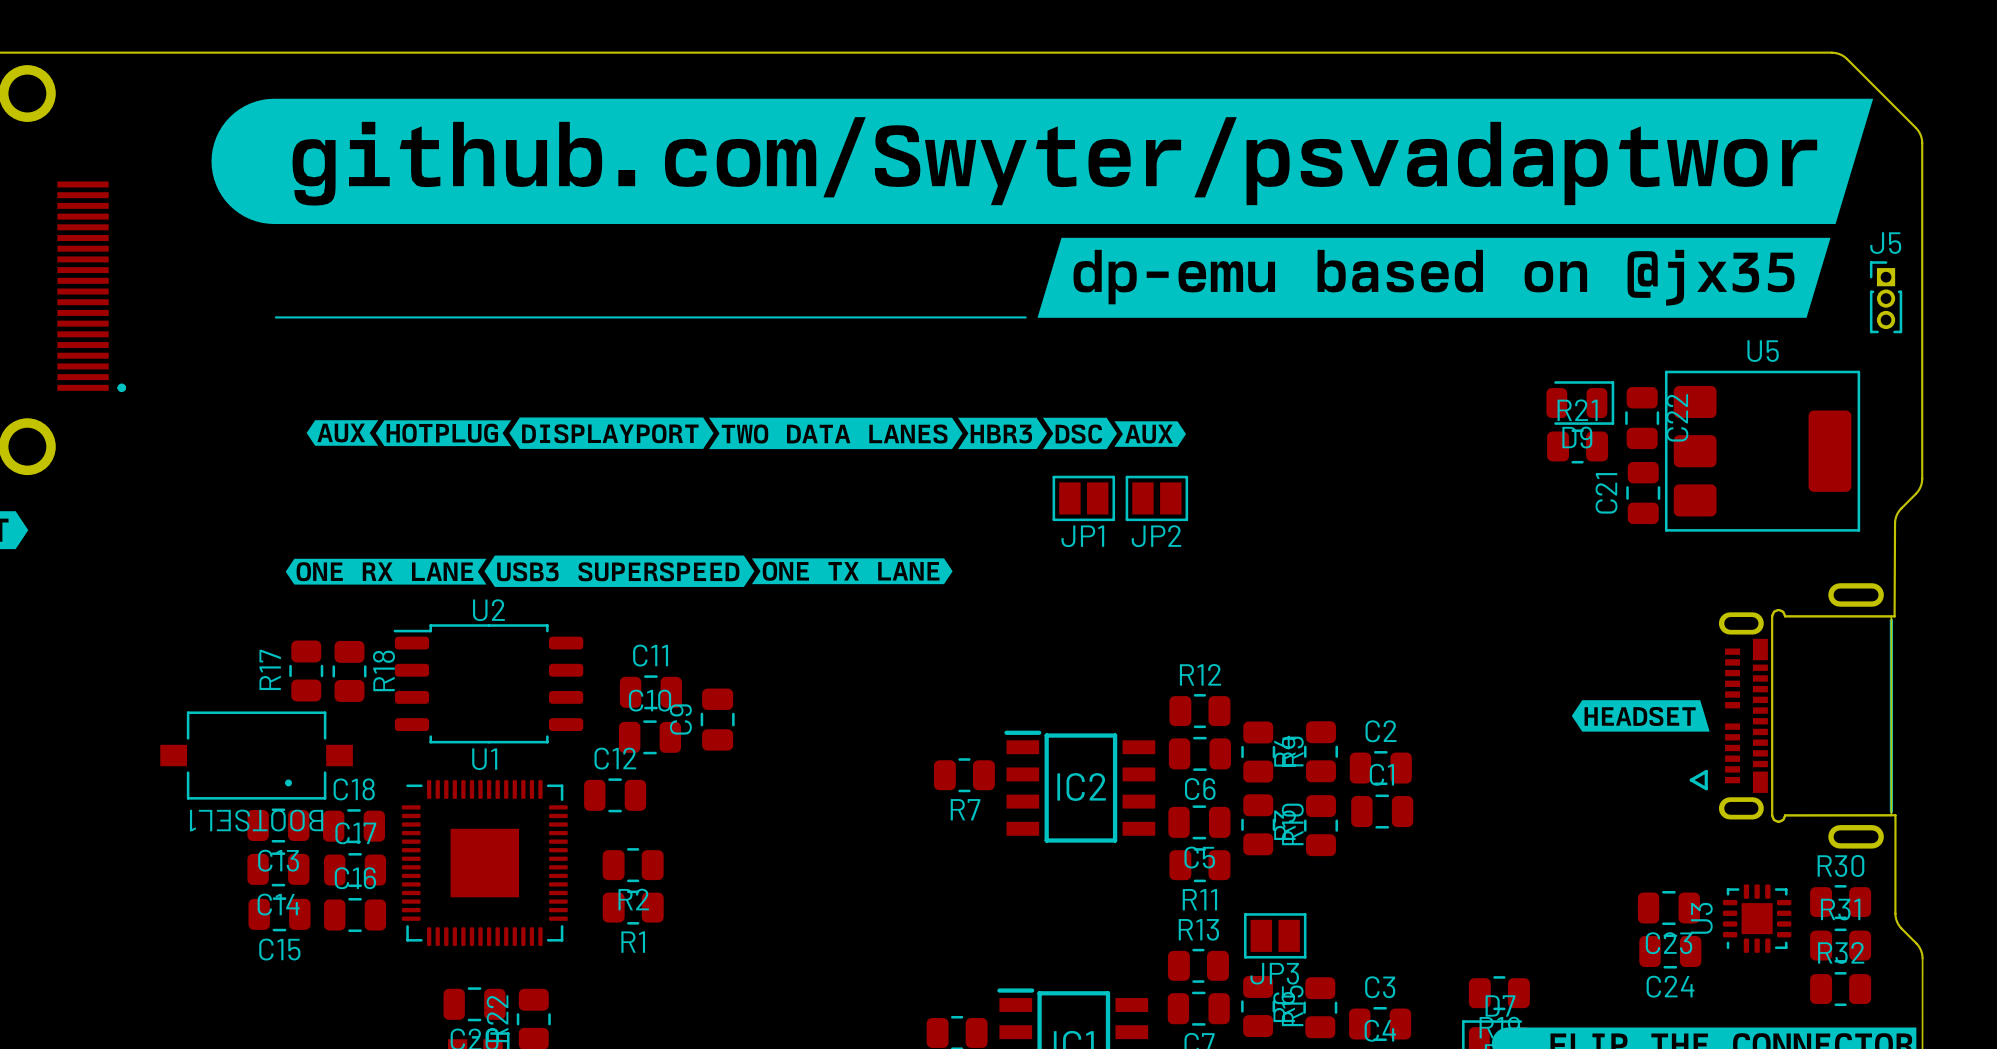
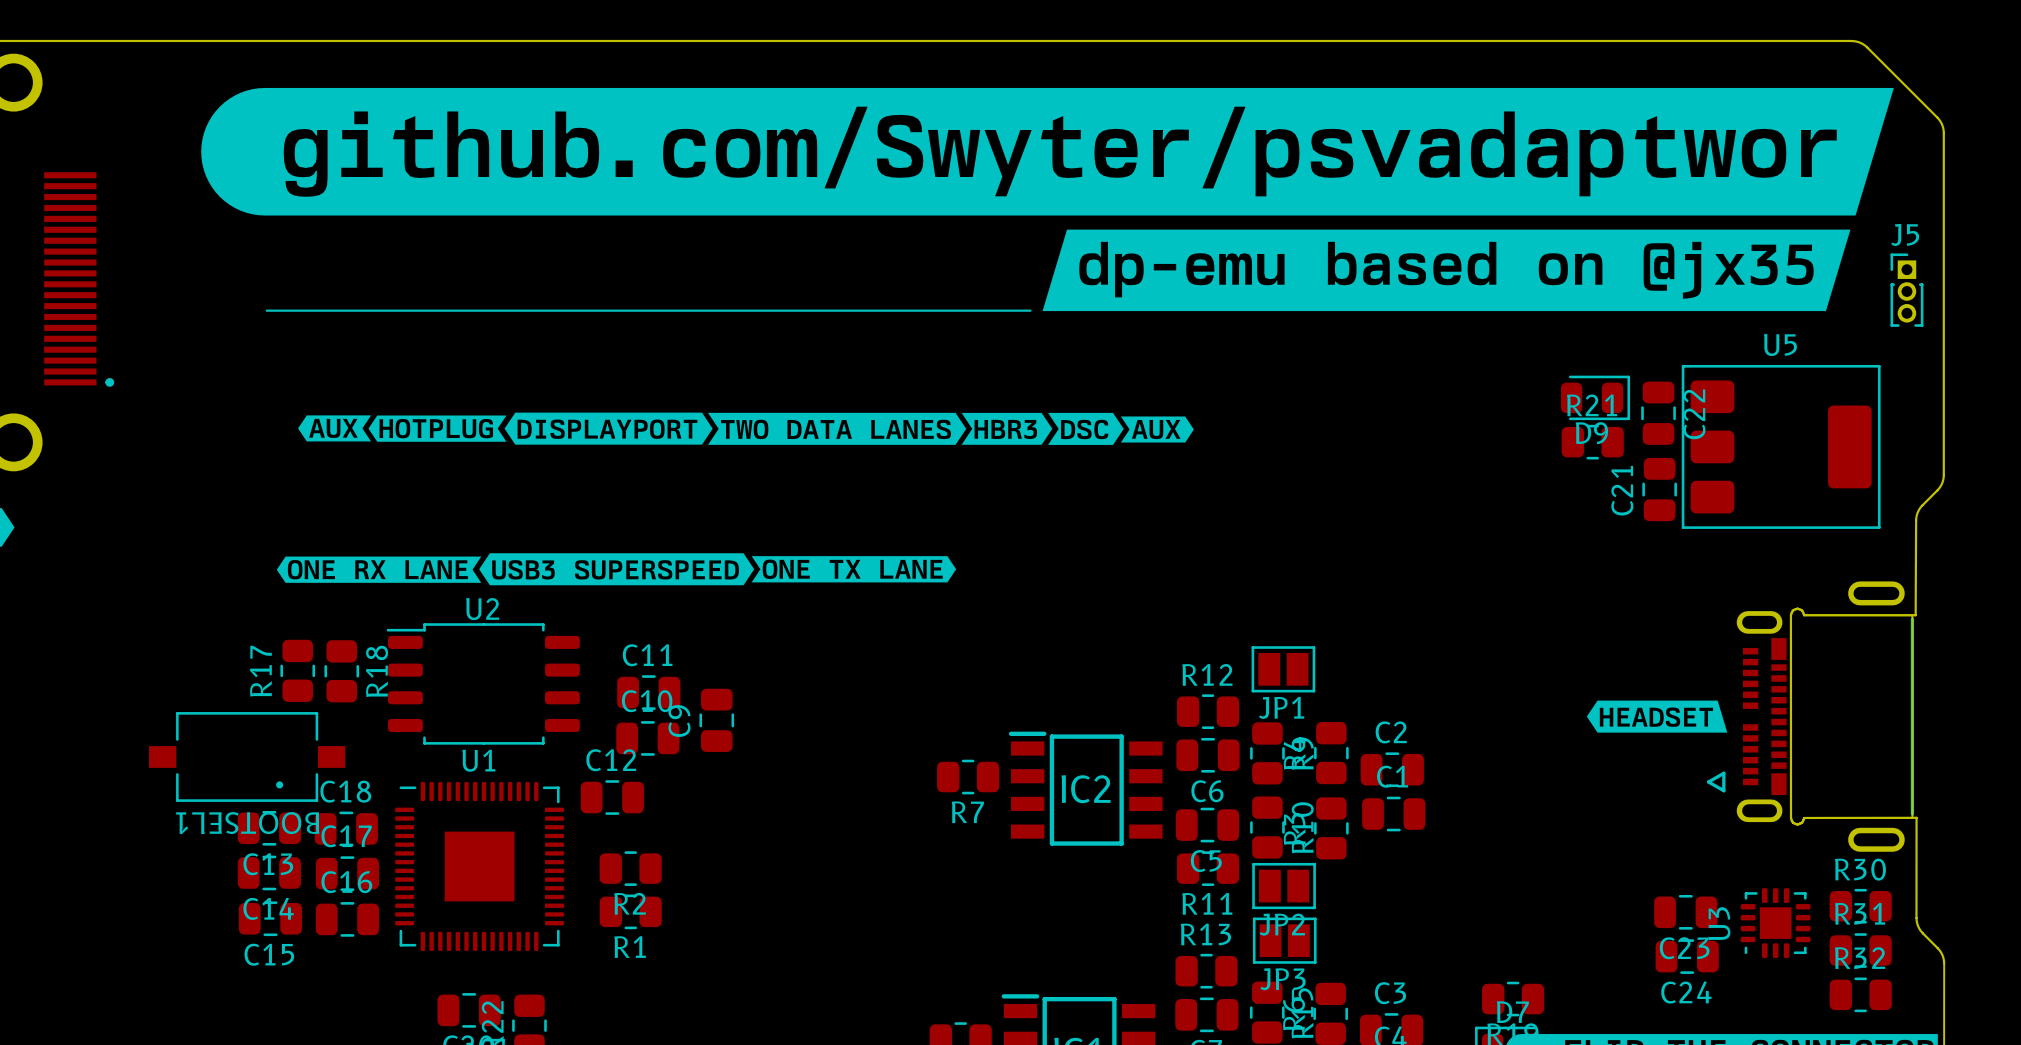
JP1 position: (1083, 498) -> (1283, 669)
JP2 position: (1156, 498) -> (1284, 886)

